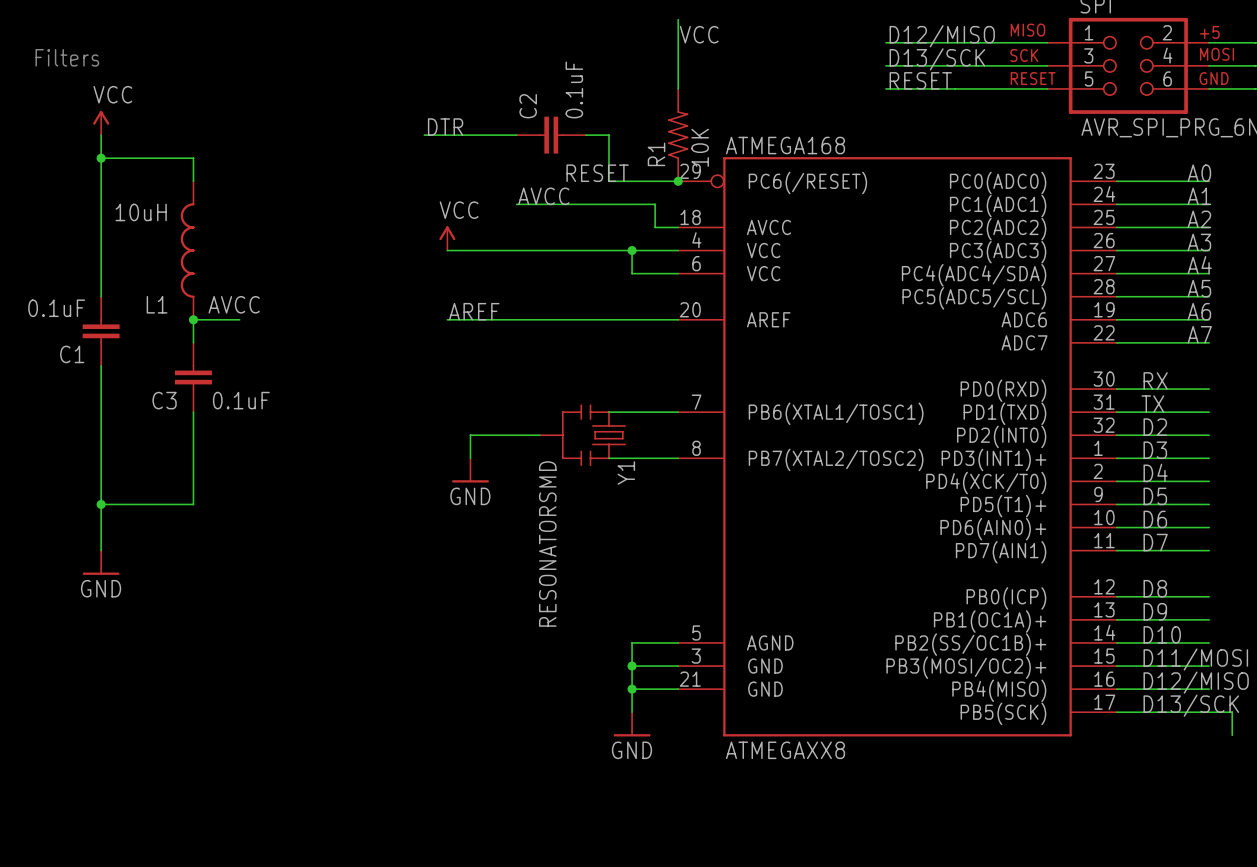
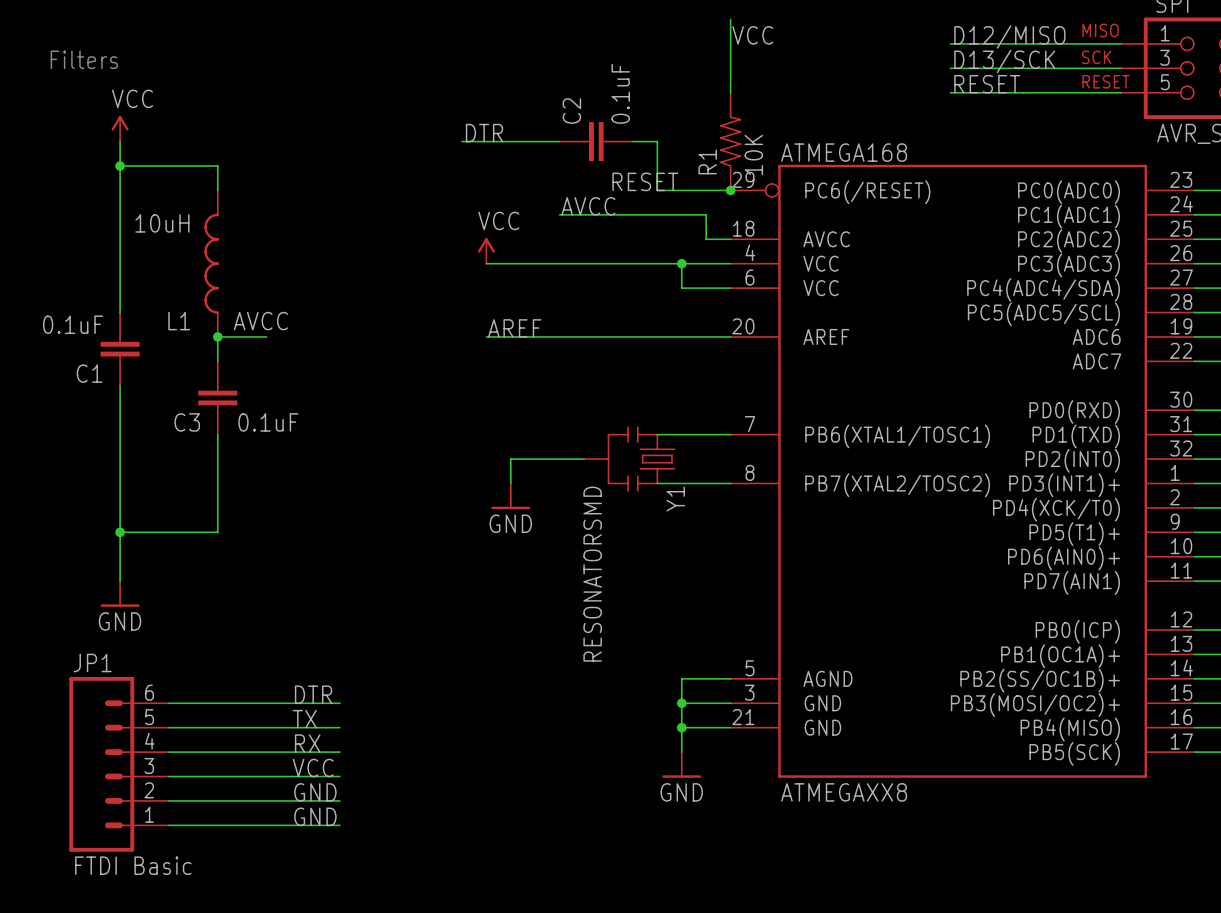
label: none -> DTR (313, 694)
wire: none -> (168, 703) (339, 703)
label: none -> TX (304, 719)
wire: none -> (168, 727) (339, 727)
label: none -> RX (307, 743)
wire: none -> (168, 752) (339, 752)
JP1: none -> FTDI Basic (119, 764)
label: none -> VCC (313, 767)
wire: none -> (168, 776) (339, 776)
label: none -> GND (315, 792)
wire: none -> (168, 800) (339, 800)
label: none -> GND (315, 816)
wire: none -> (168, 825) (339, 825)

